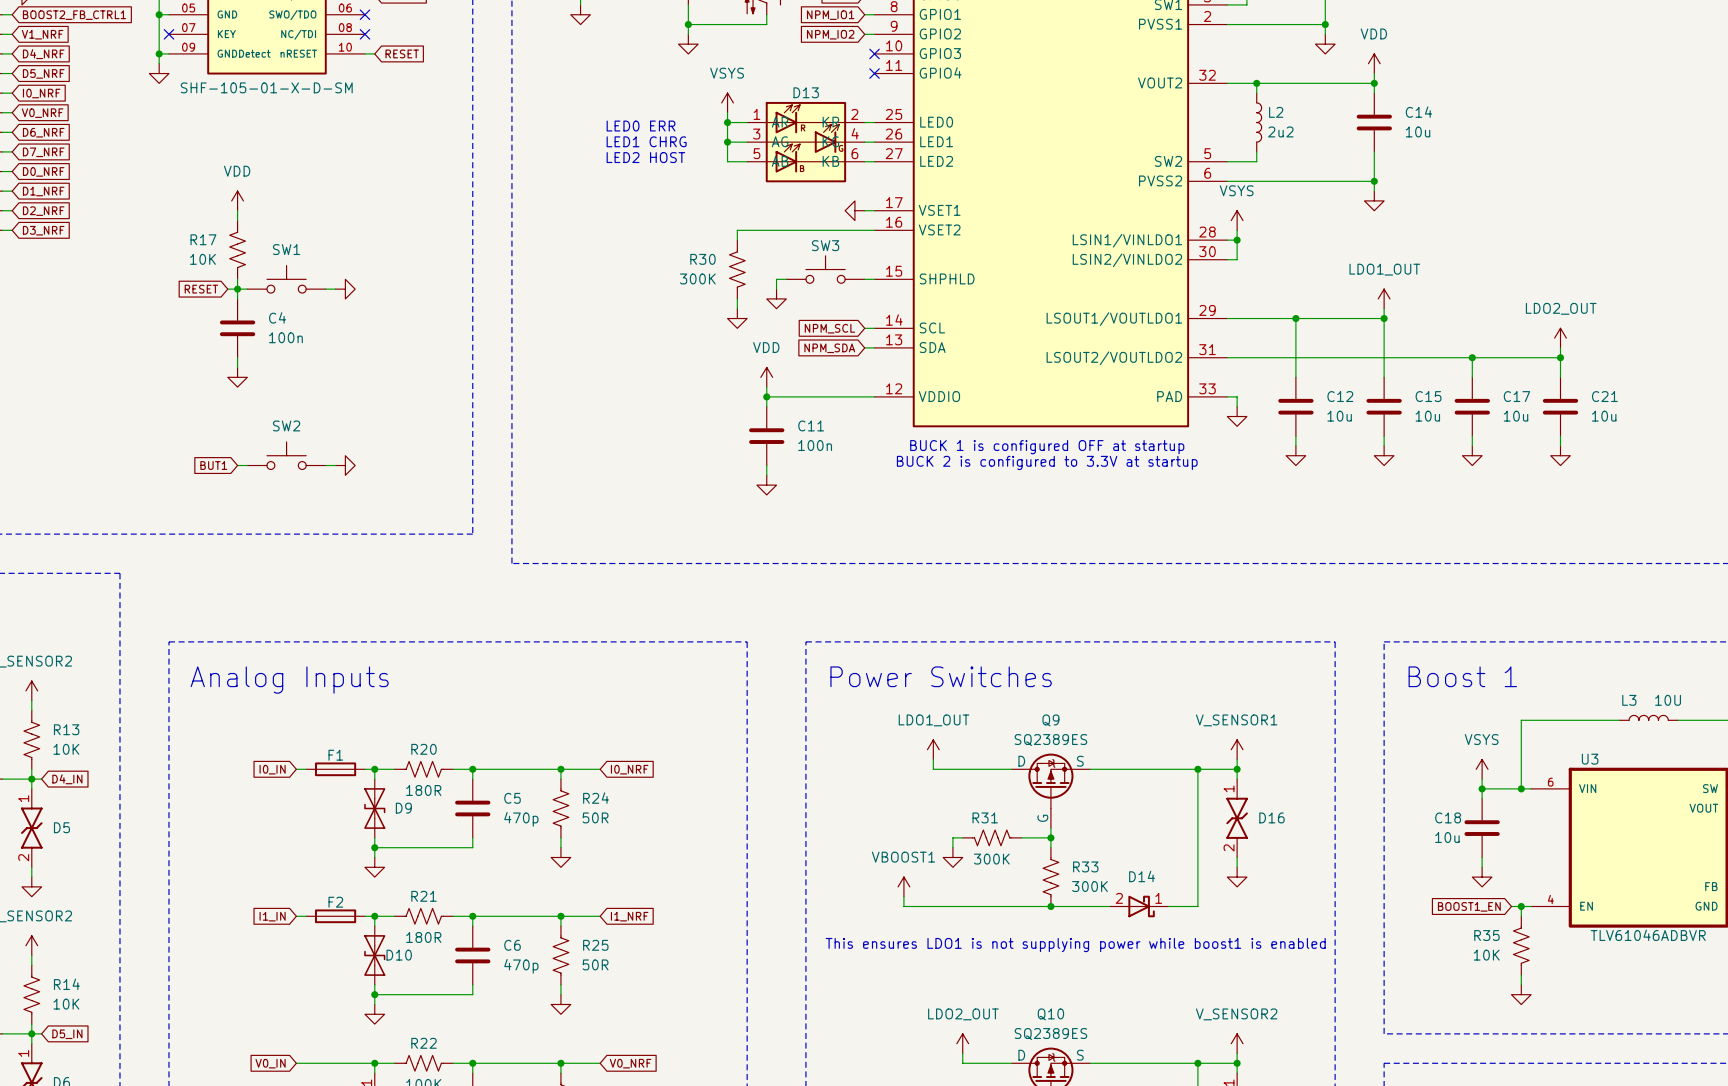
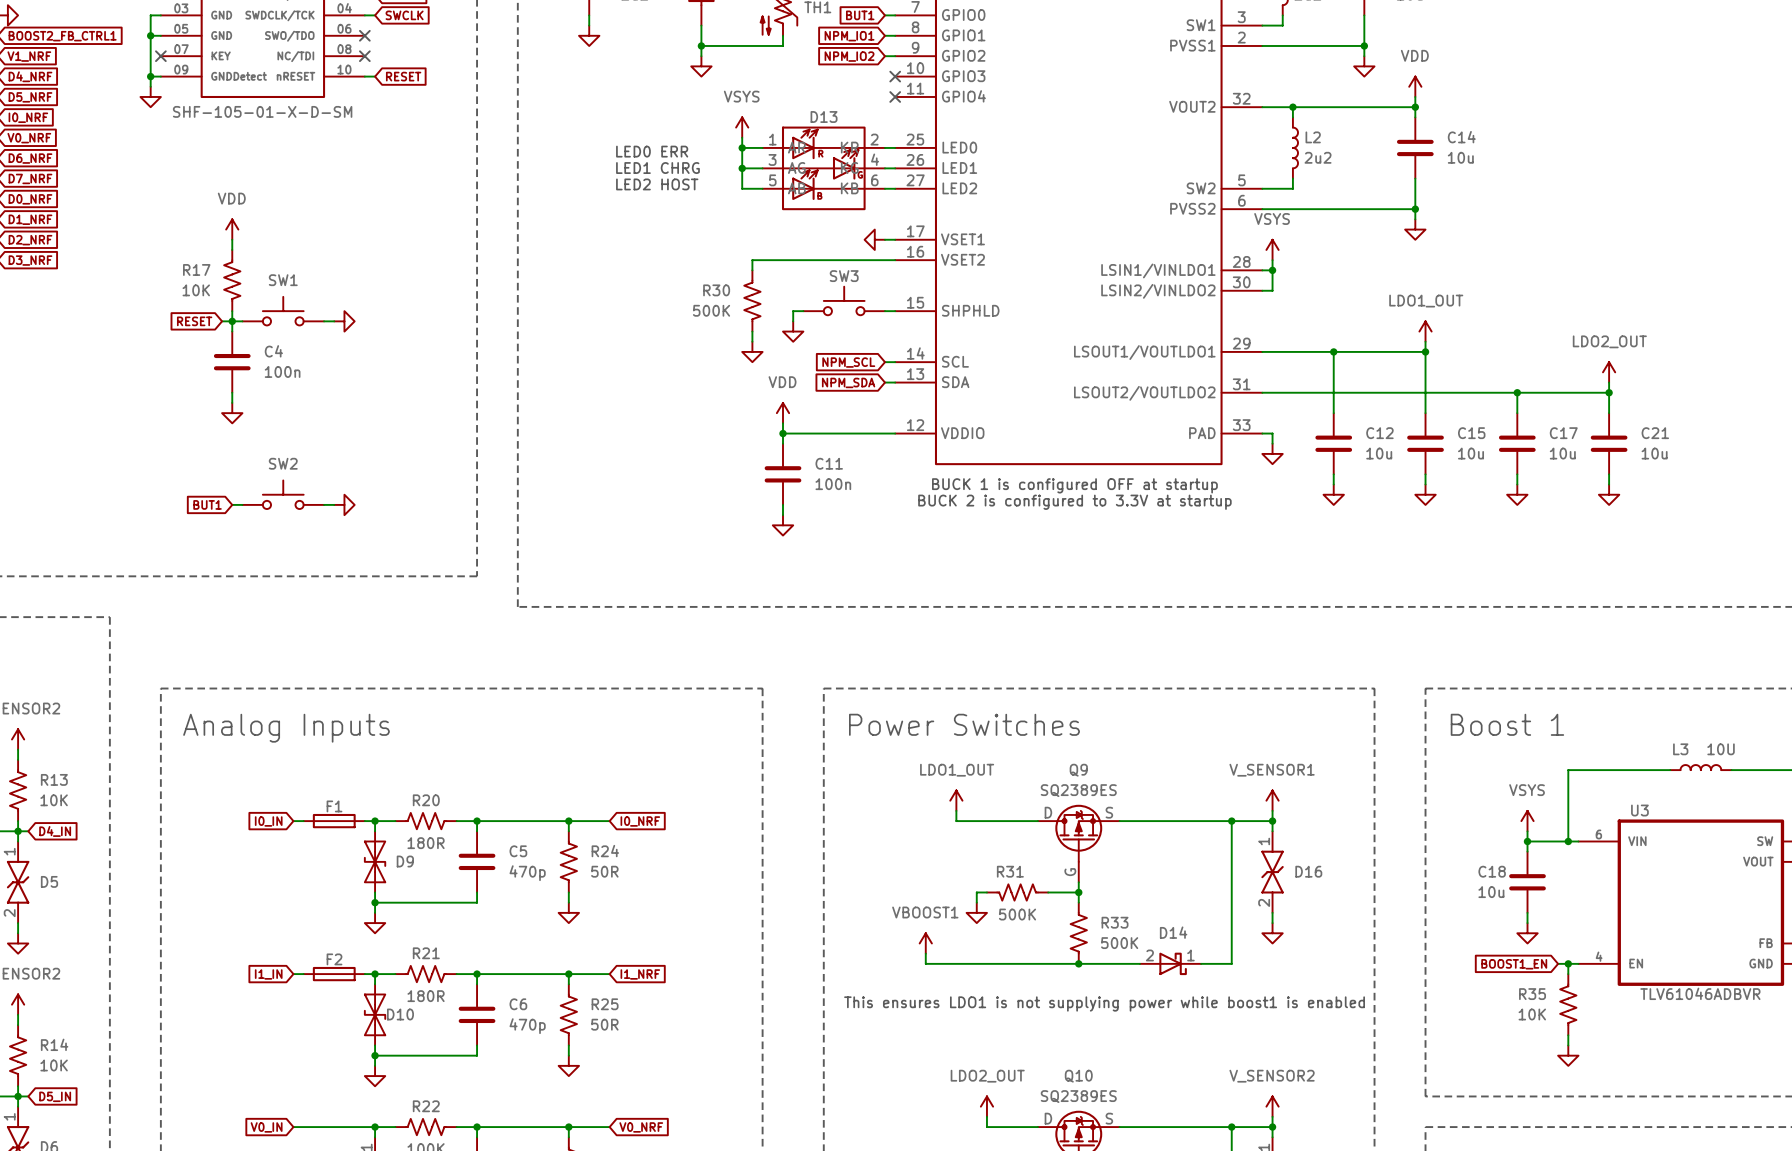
R30 value: 300K (697, 278) -> 500K (711, 310)
R31 value: 300K (991, 859) -> 500K (1017, 914)
R33 value: 300K (1089, 886) -> 500K (1119, 943)

